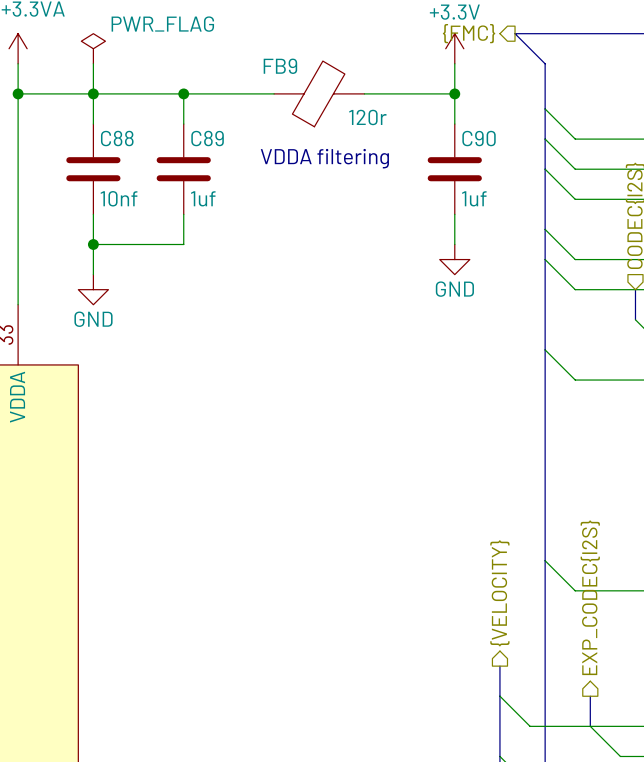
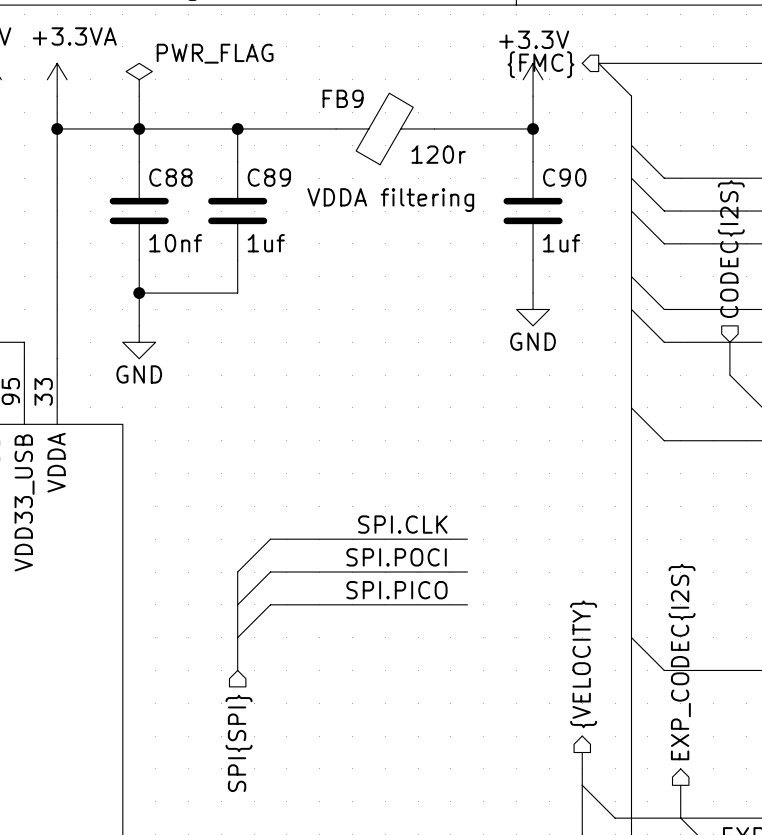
label: none -> SPI.CLK (402, 524)
wire: none -> (467, 539) (270, 539) (237, 572)
label: none -> SPI.POCI (396, 557)
bus: none -> (237, 572) (237, 670)
wire: none -> (467, 572) (270, 572) (237, 604)
label: none -> SPI.PICO (396, 590)
wire: none -> (467, 604) (270, 604) (237, 637)
hierarchical label: none -> SPI{SPI} (239, 743)

